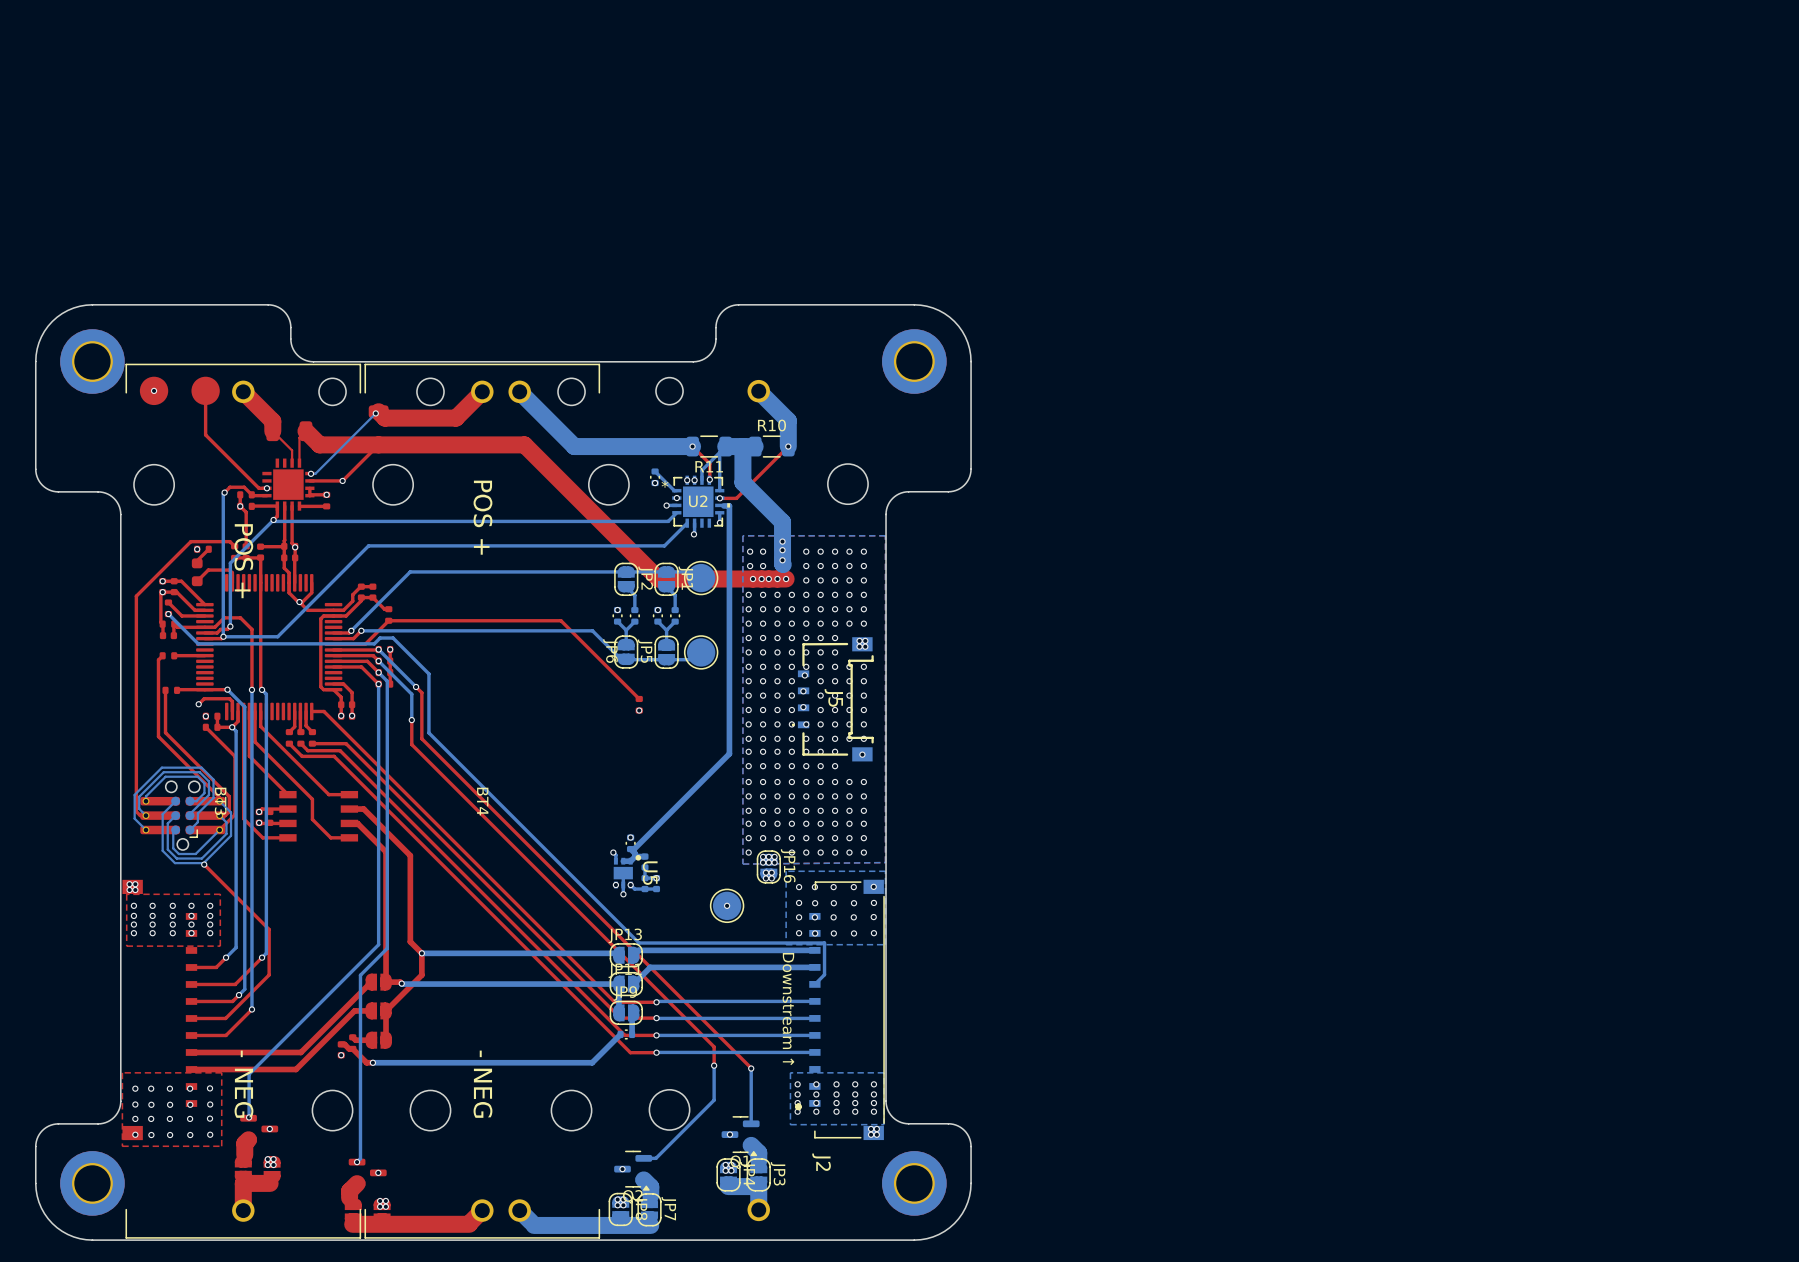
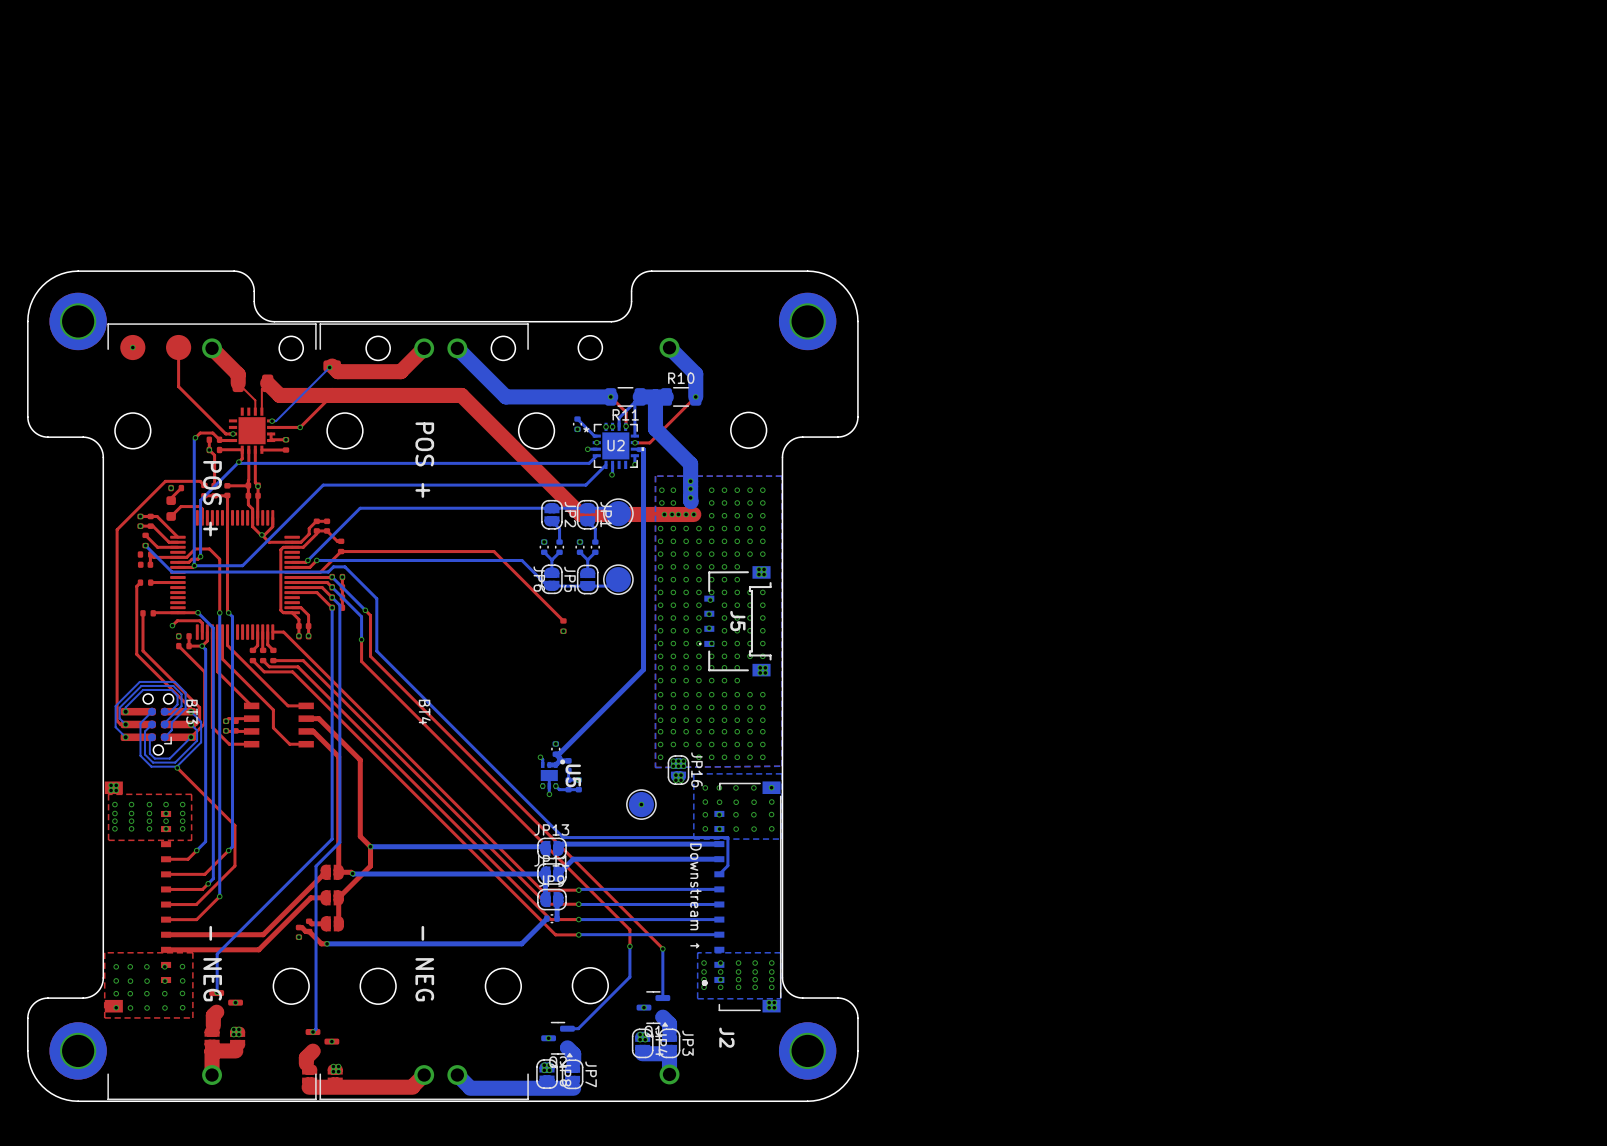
top track: (162, 592) (160, 593) (160, 622) (163, 624) (163, 635) -> none
via: none -> (760, 667)
via: none -> (765, 667)
via: (862, 754) -> none
via: none -> (760, 672)
via: none -> (765, 672)

